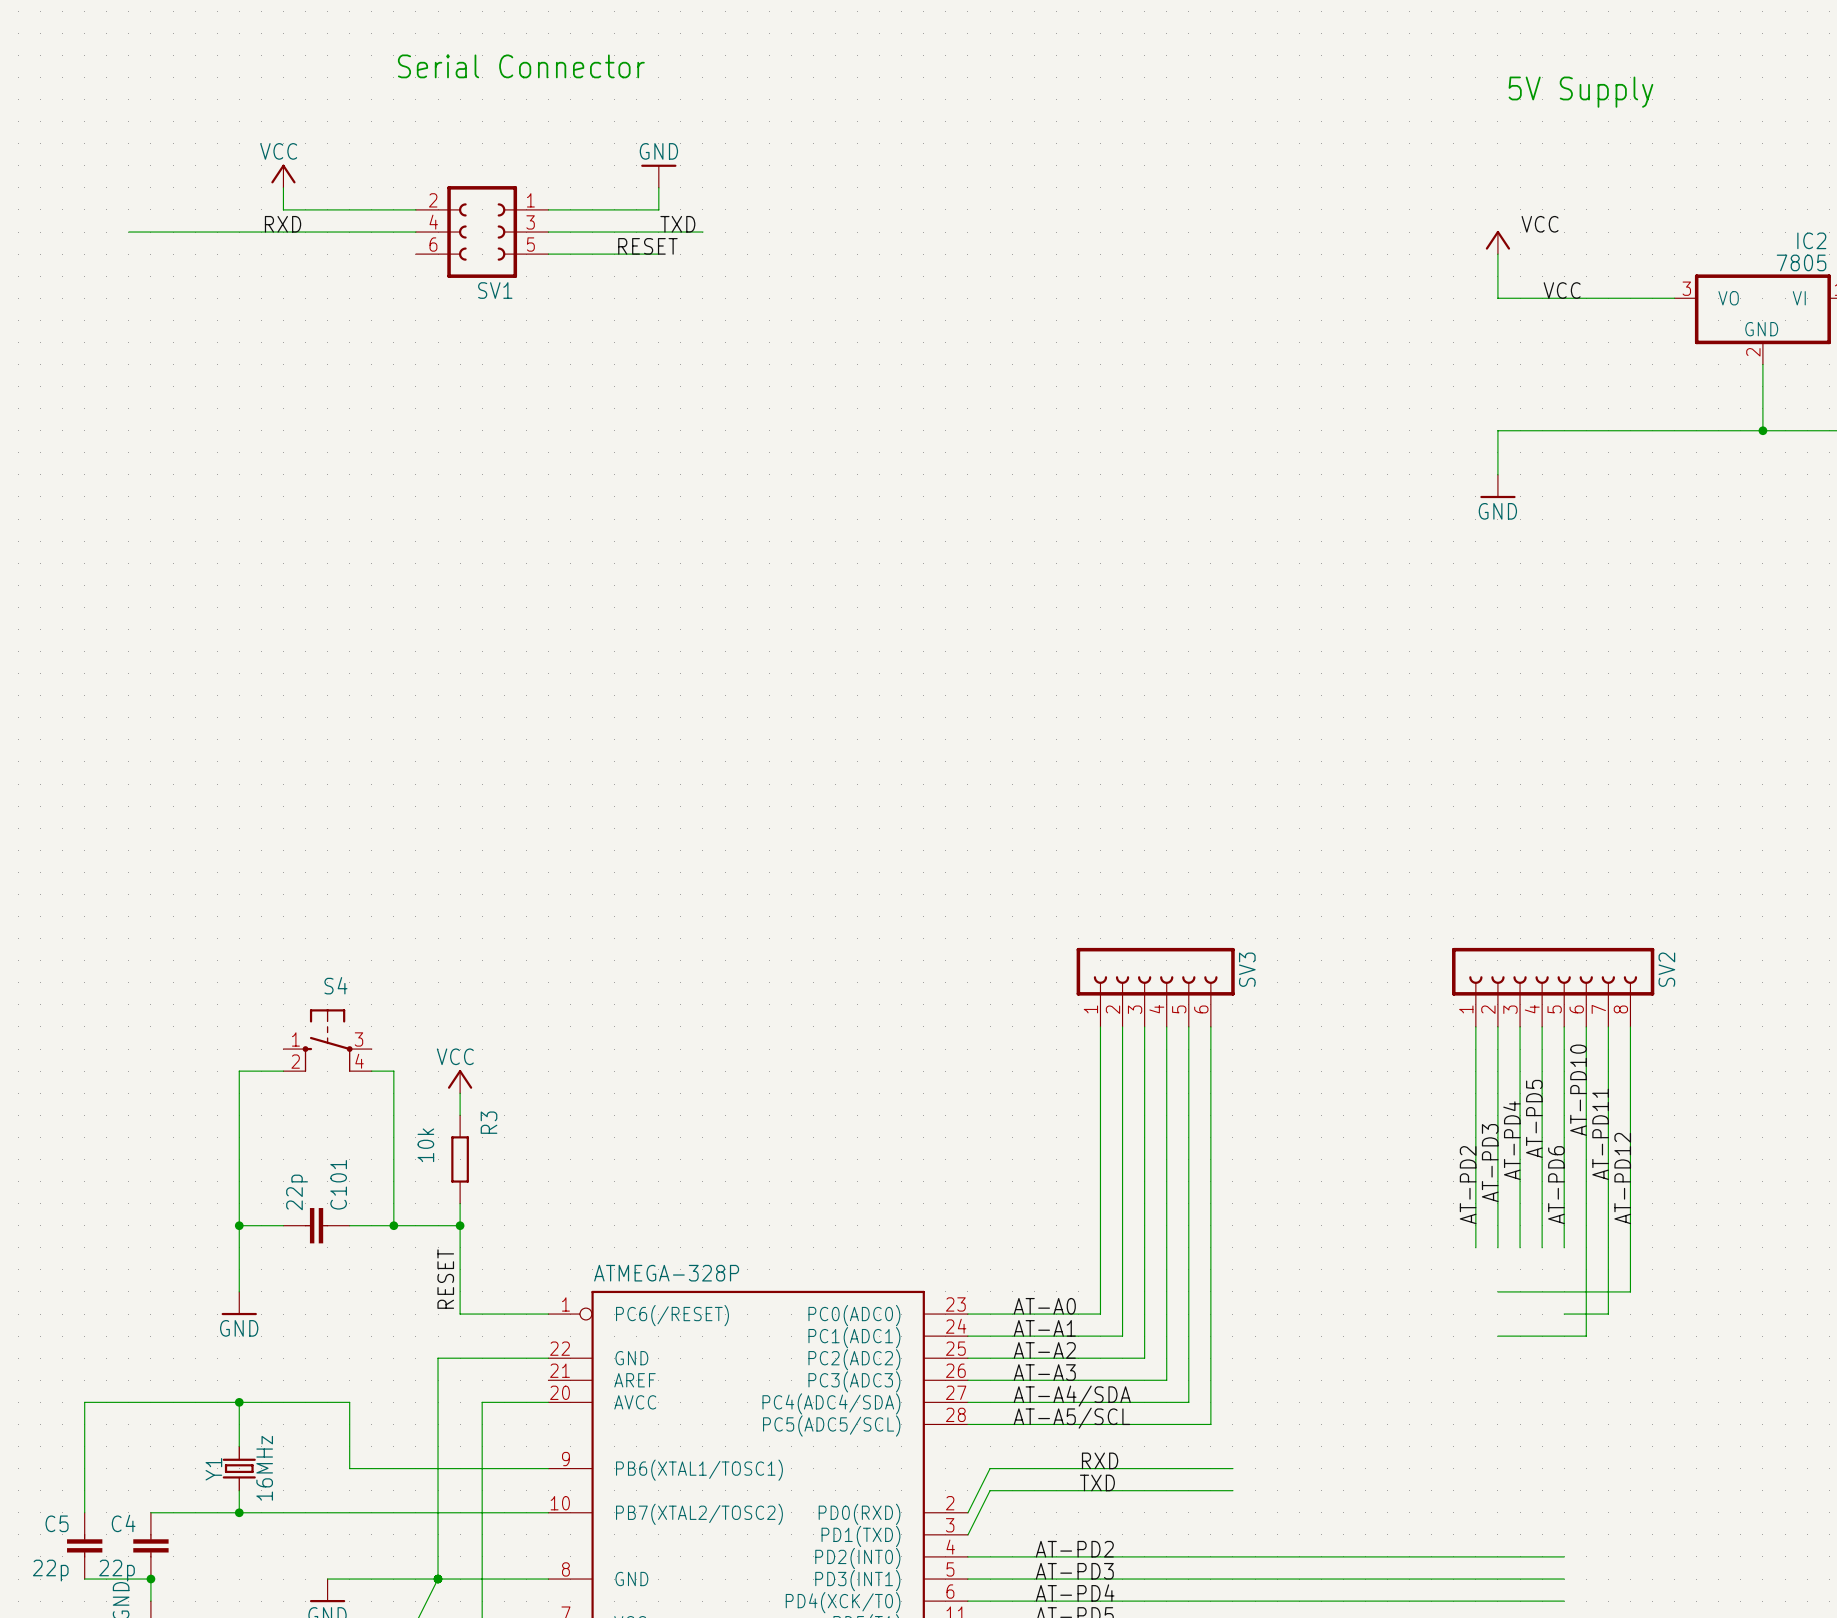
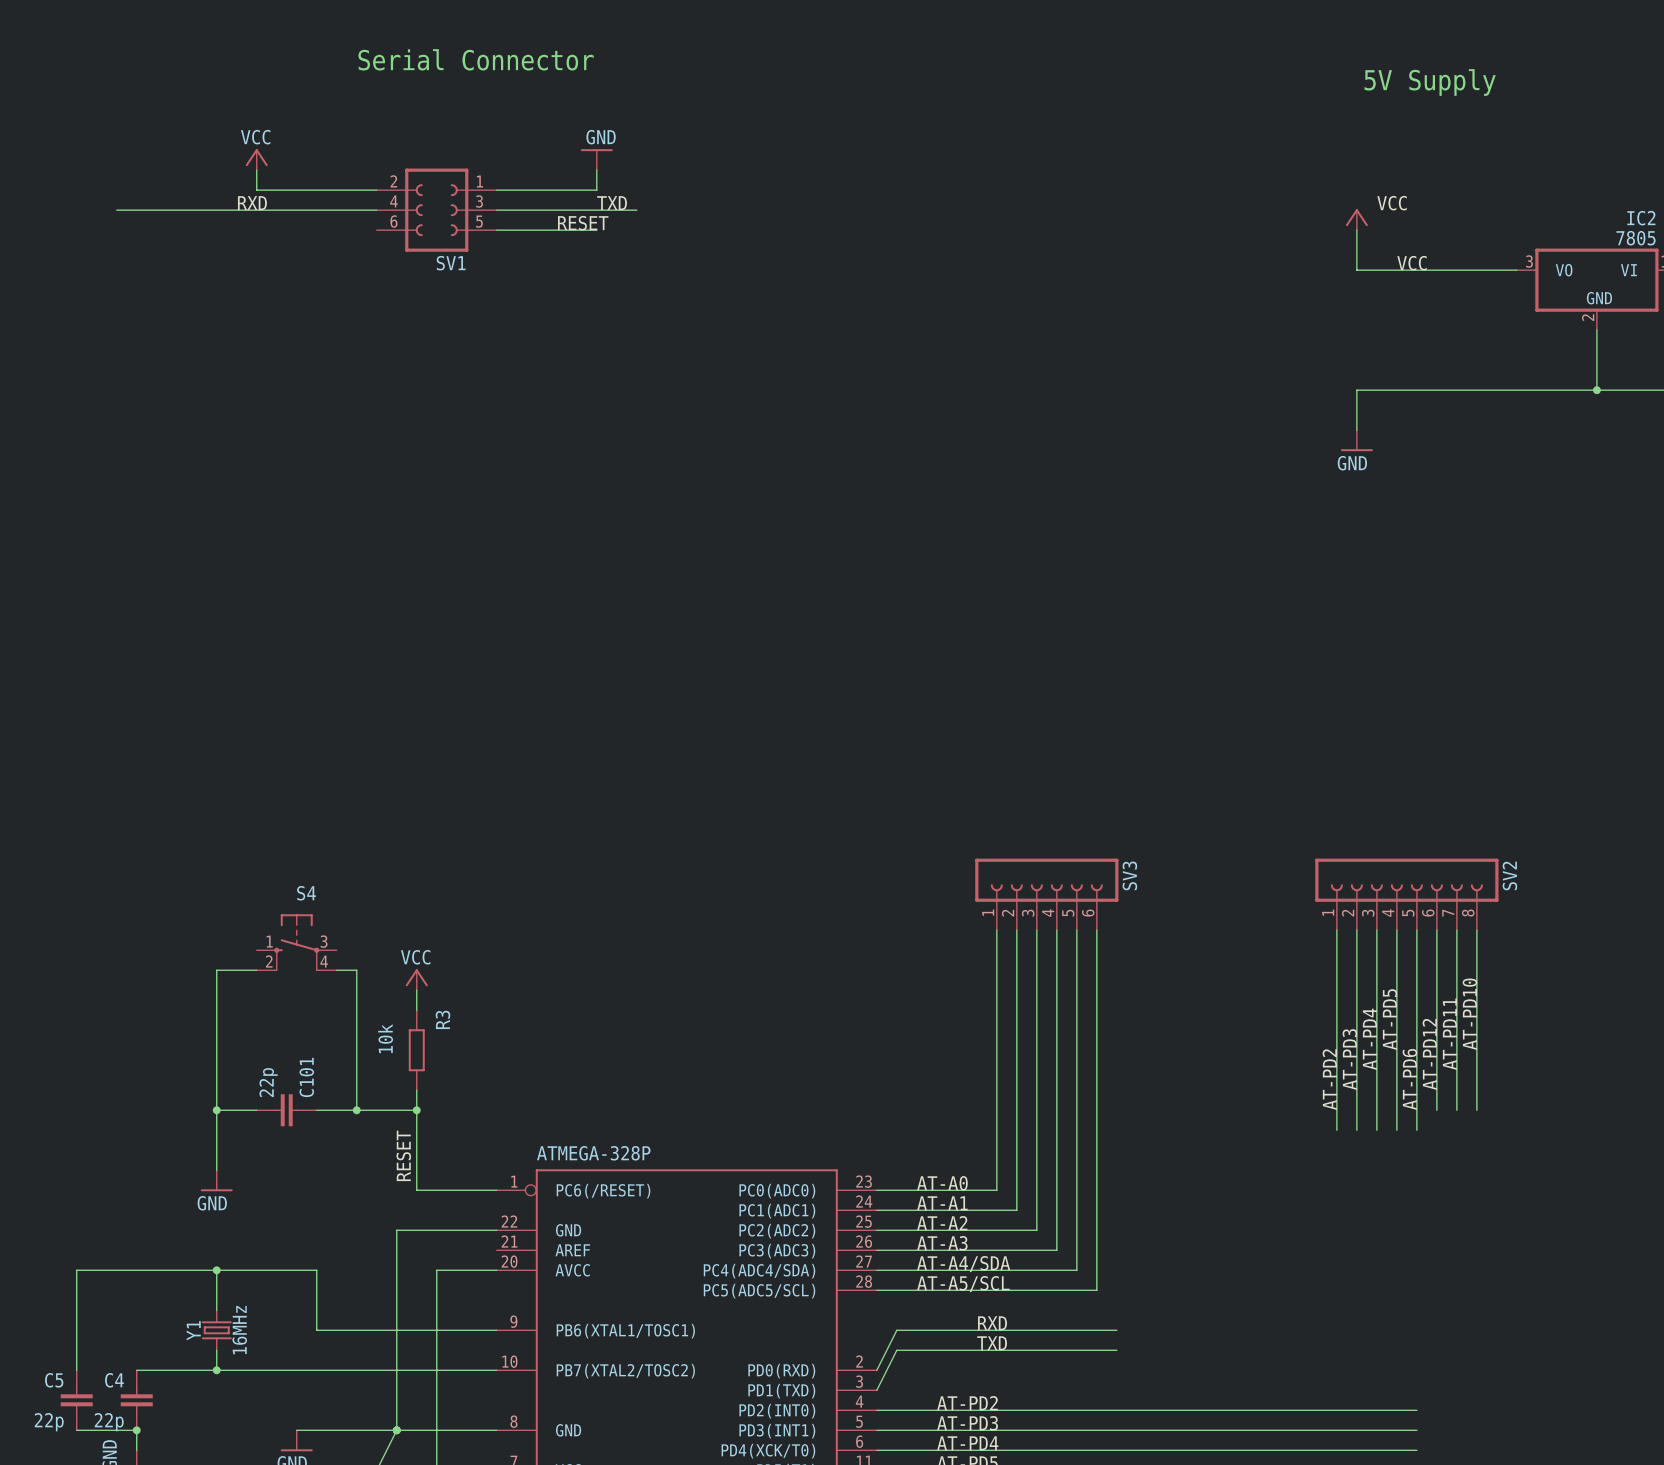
label position: AT-PD10 (1578, 1090) -> AT-PD10 (1469, 1014)
label position: AT-PD12 (1622, 1178) -> AT-PD12 (1429, 1054)
wire: (1586, 1225) (1586, 1336) (1497, 1336) -> none
wire: (1608, 1225) (1608, 1314) (1564, 1314) -> none
wire: (1630, 1225) (1630, 1291) (1497, 1291) -> none

